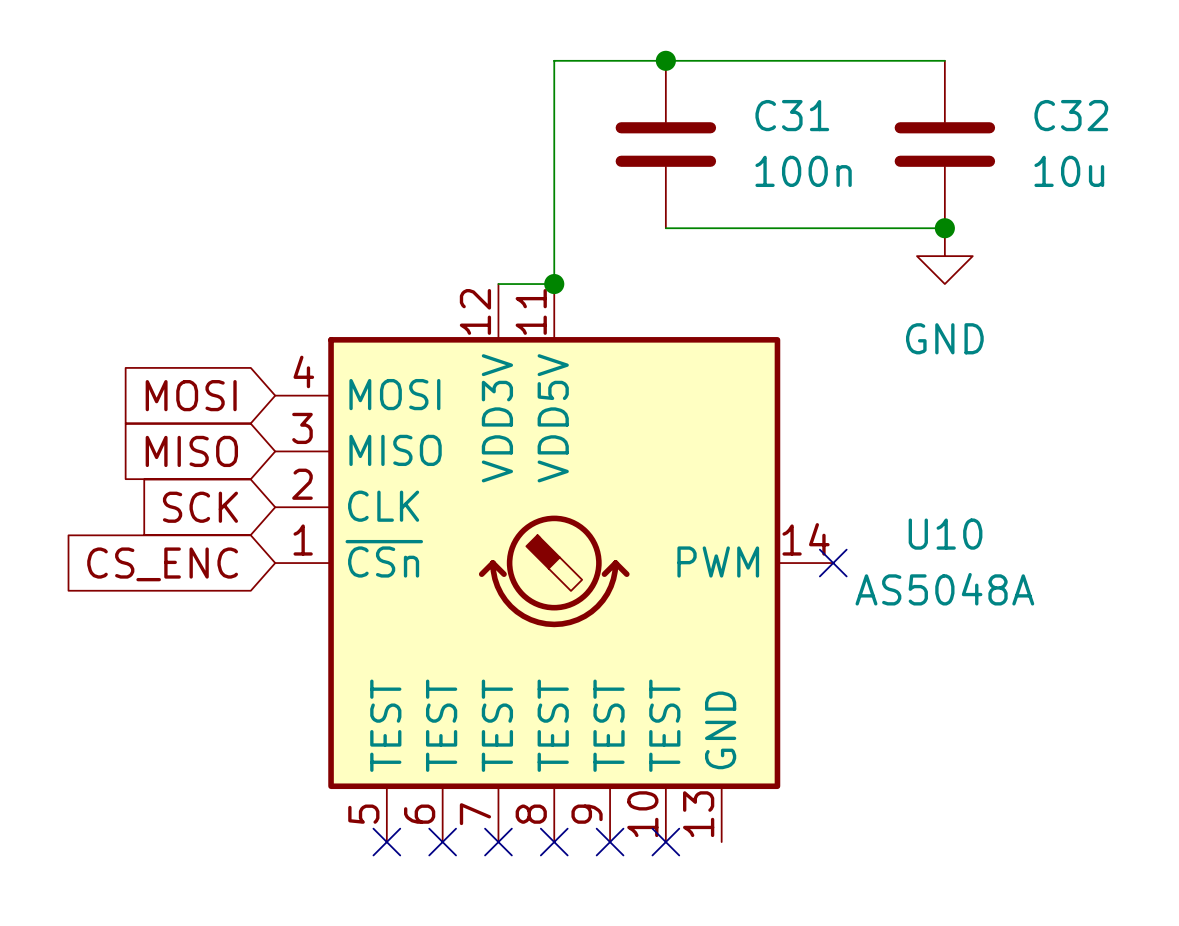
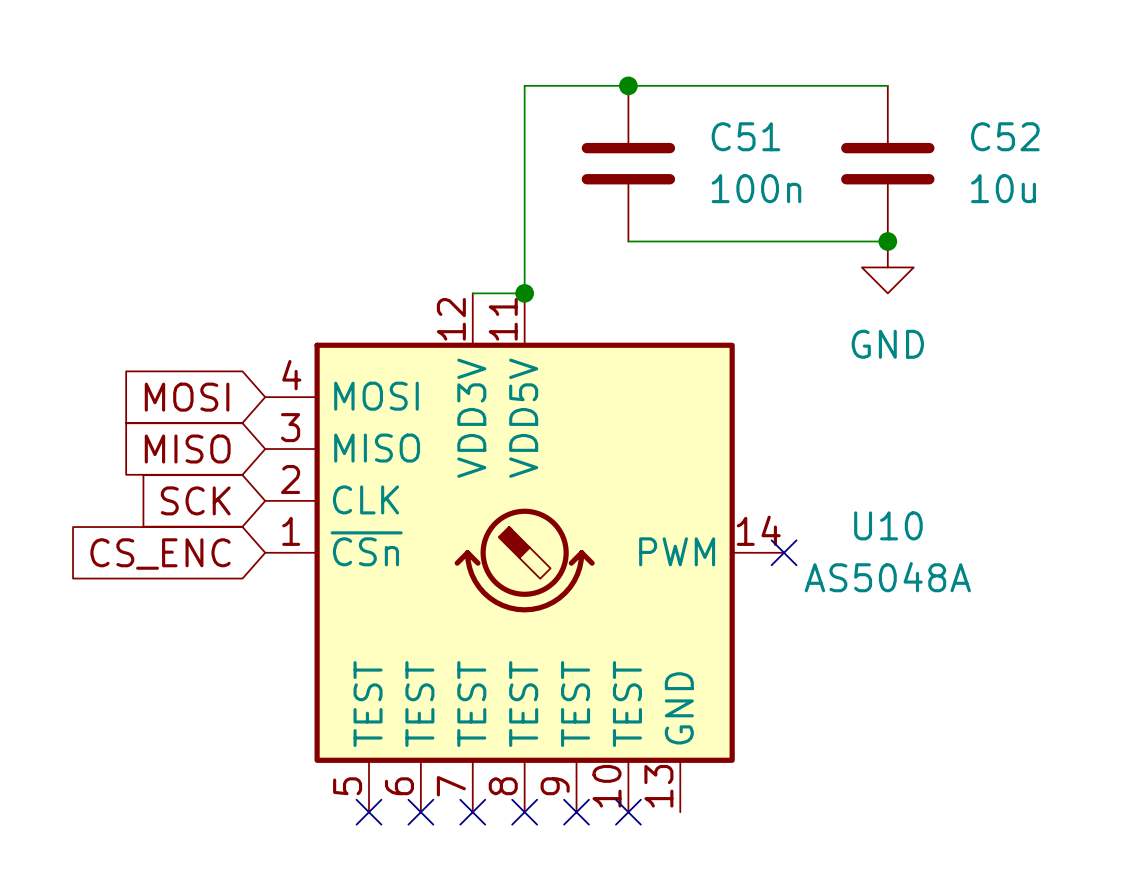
C31 name: C31 (792, 115) -> C51 (745, 136)
C32 name: C32 (1071, 115) -> C52 (1005, 136)

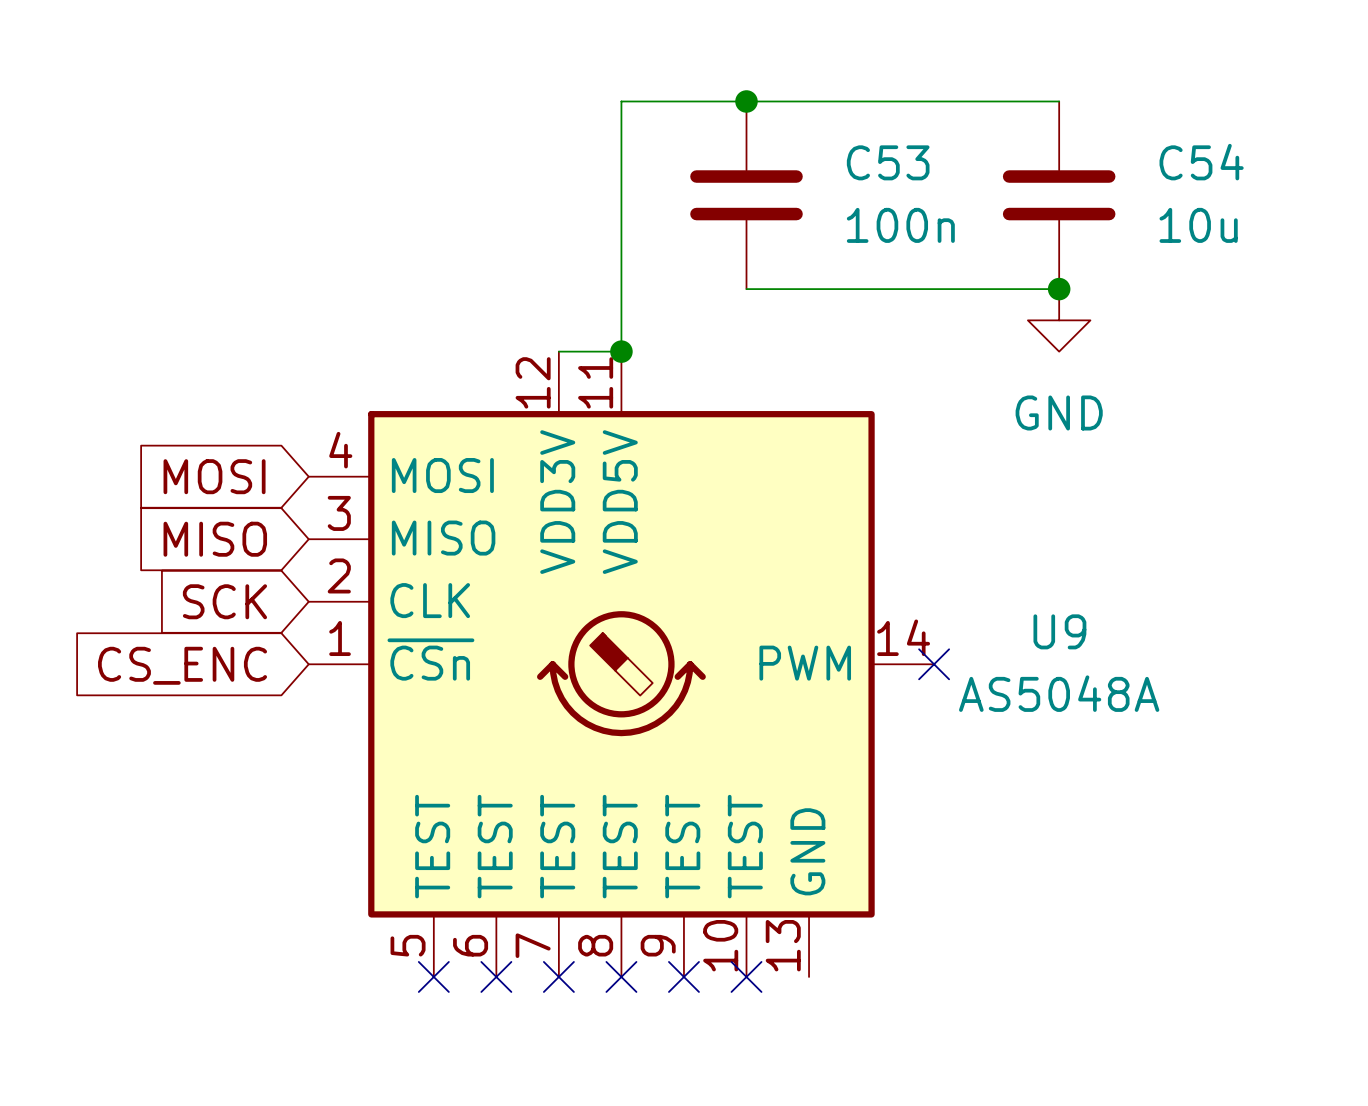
C51 name: C51 (745, 136) -> C53 (888, 162)
C52 name: C52 (1005, 136) -> C54 (1201, 162)
U10 name: U10 (888, 525) -> U9 (1059, 631)

